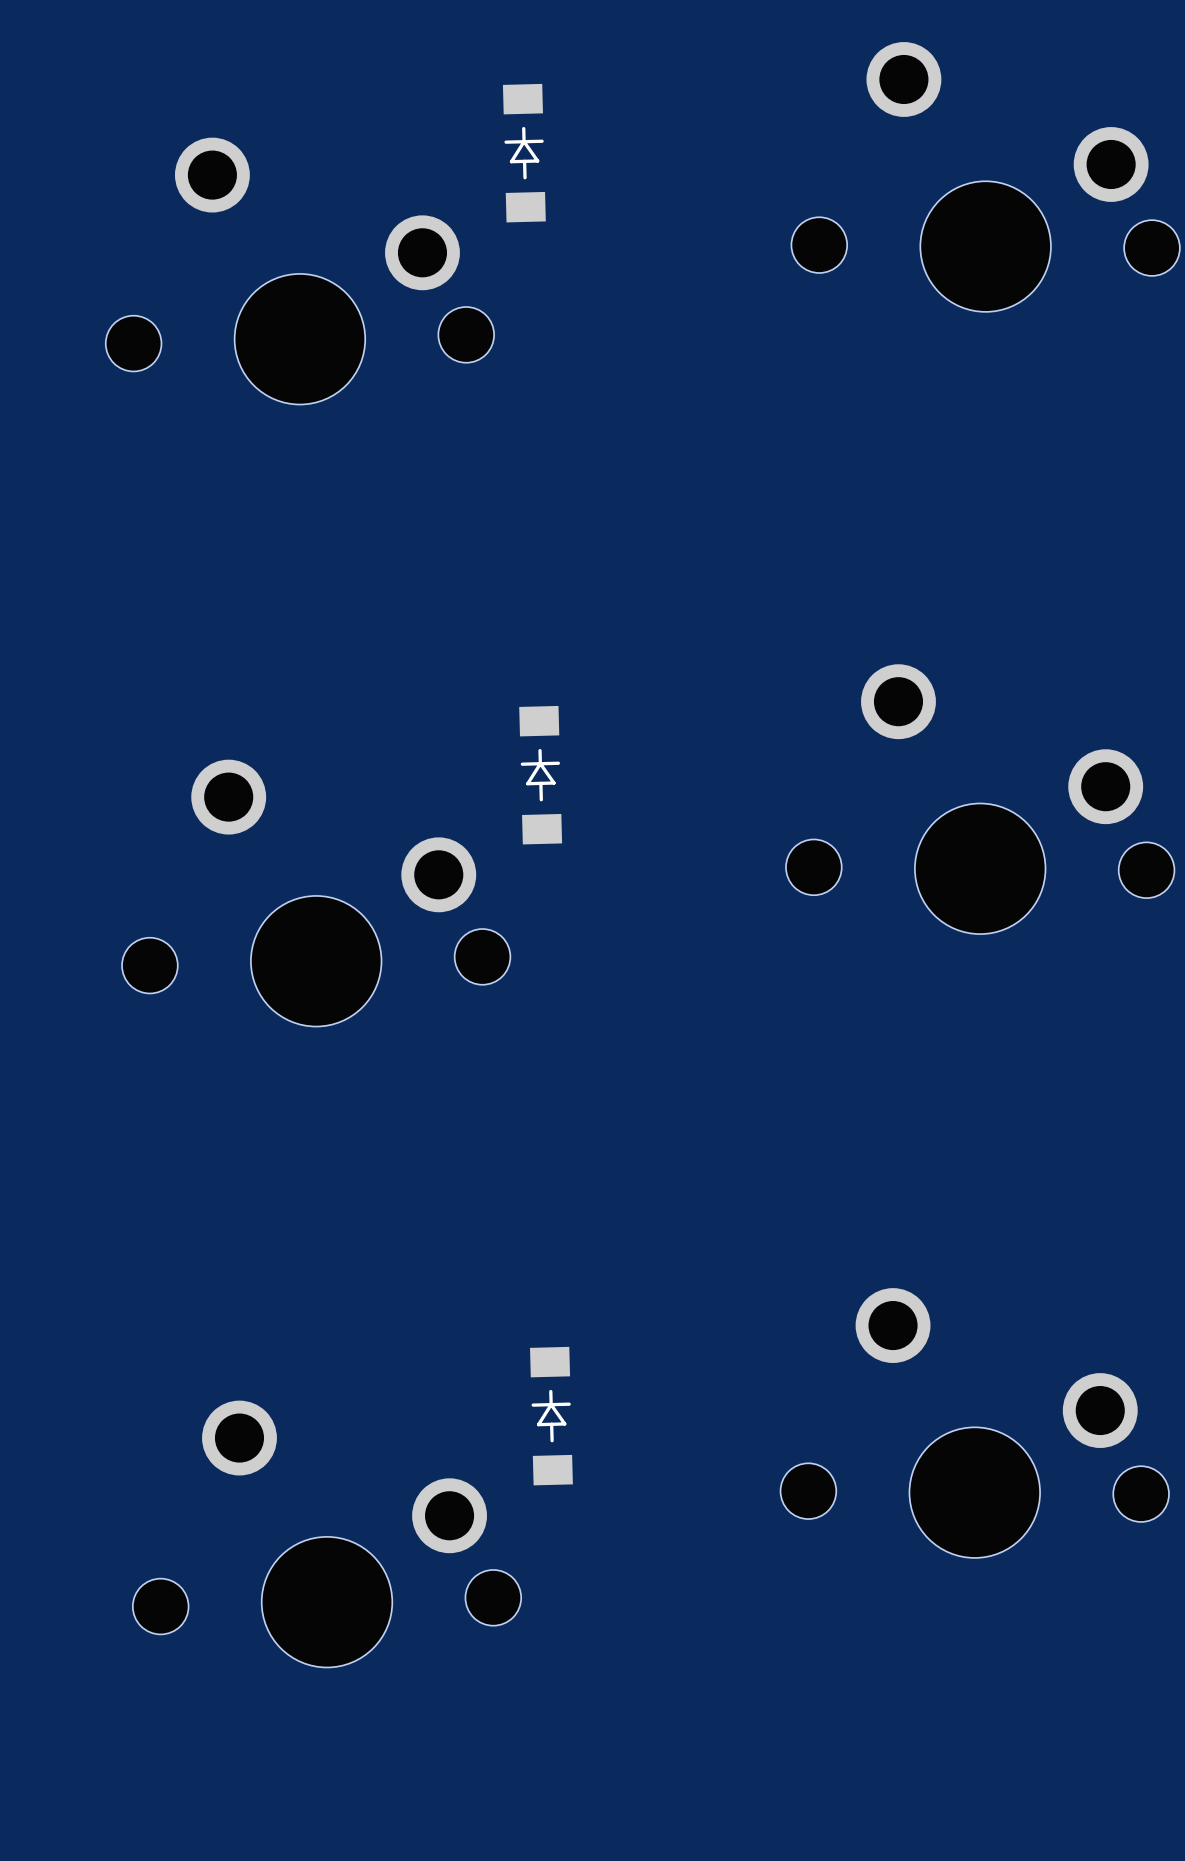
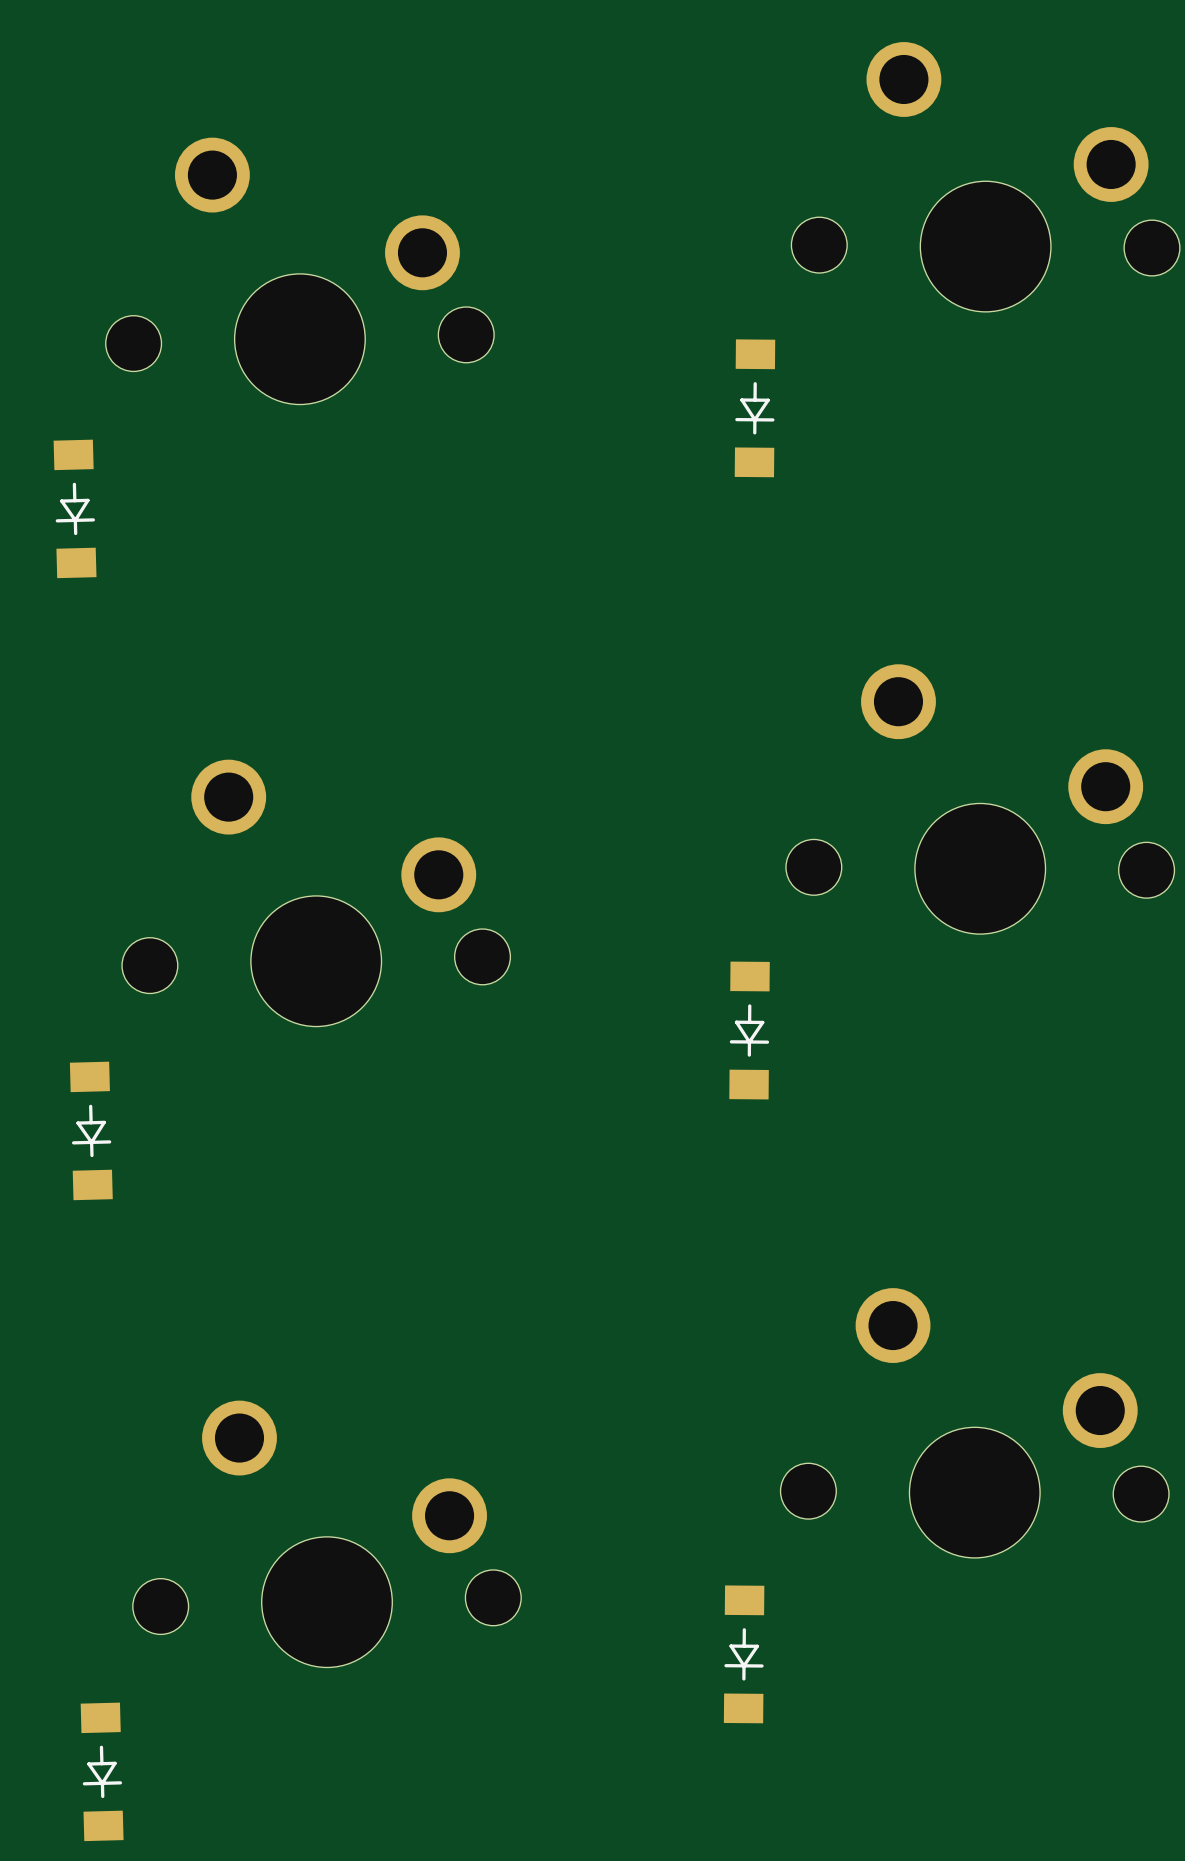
part: (524, 153) -> none
part: none -> (754, 408)
part: none -> (75, 508)
part: (540, 775) -> none
part: none -> (749, 1030)
part: none -> (91, 1130)
part: (551, 1416) -> none
part: none -> (744, 1654)
part: none -> (102, 1771)

